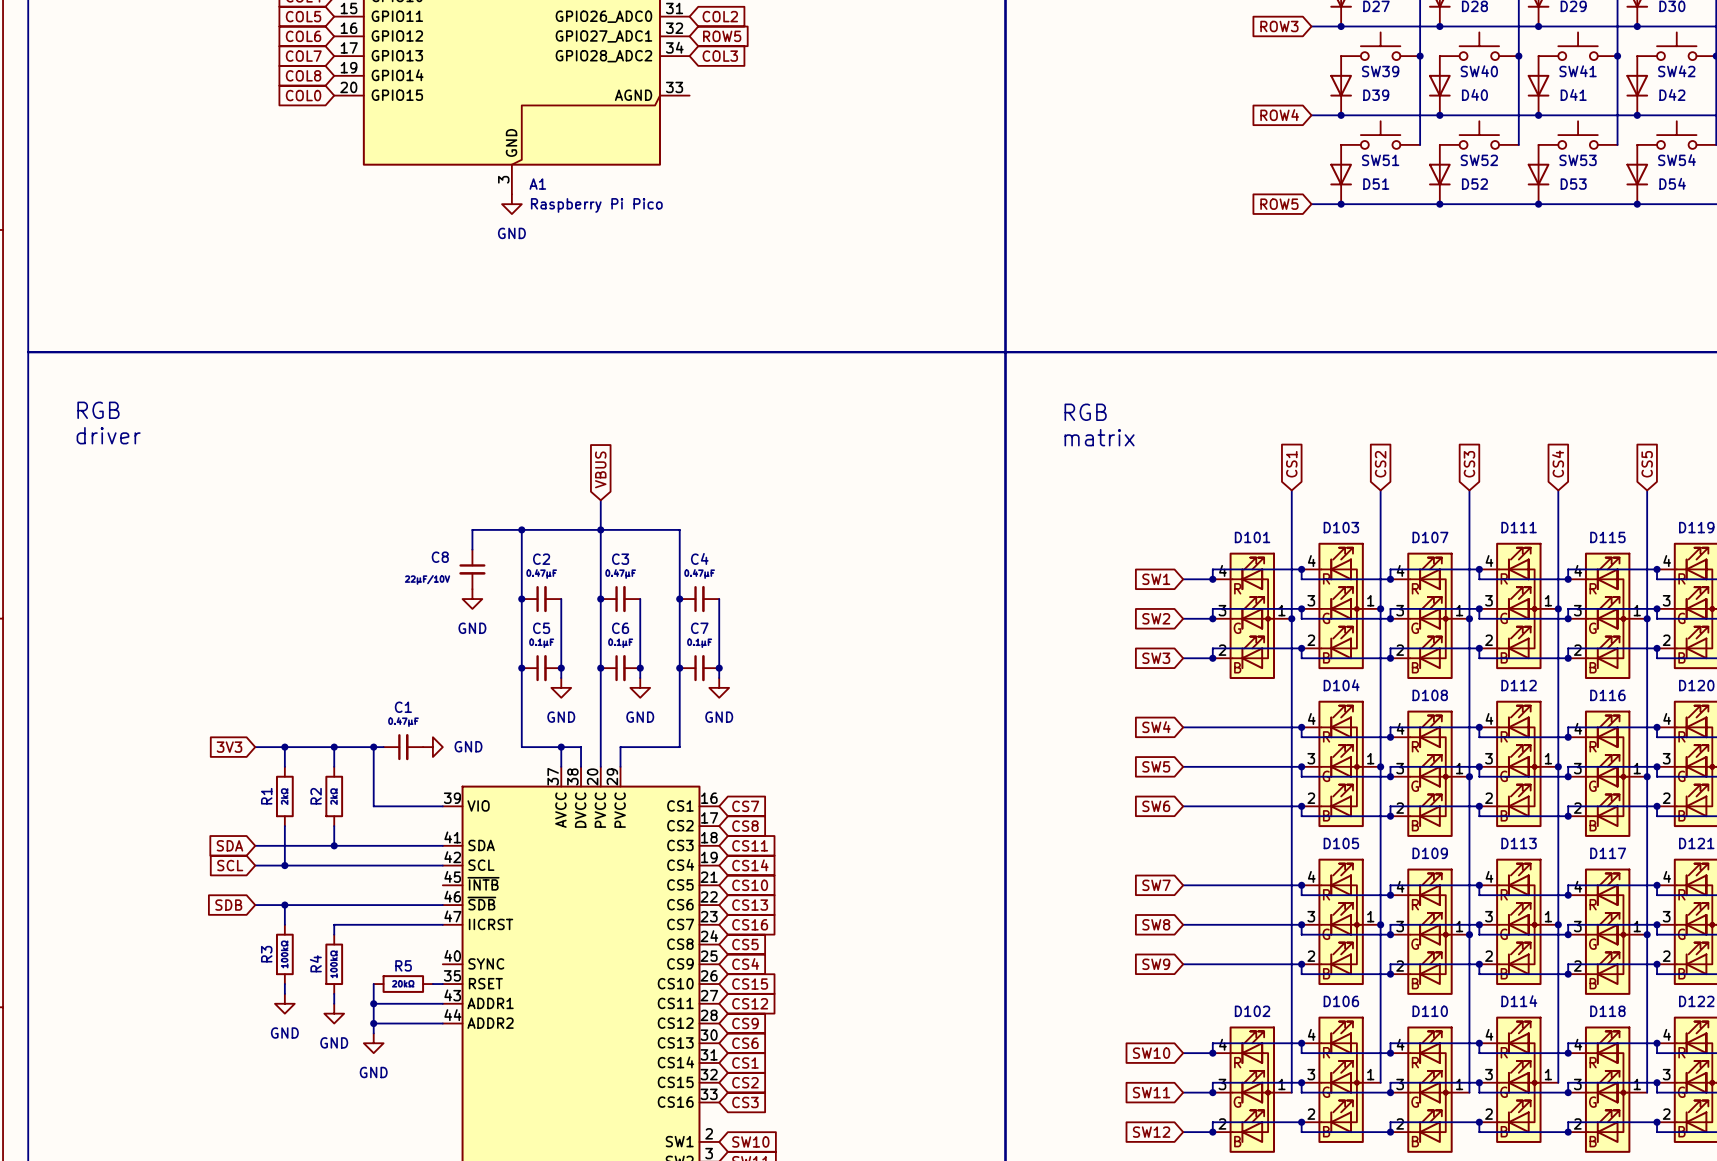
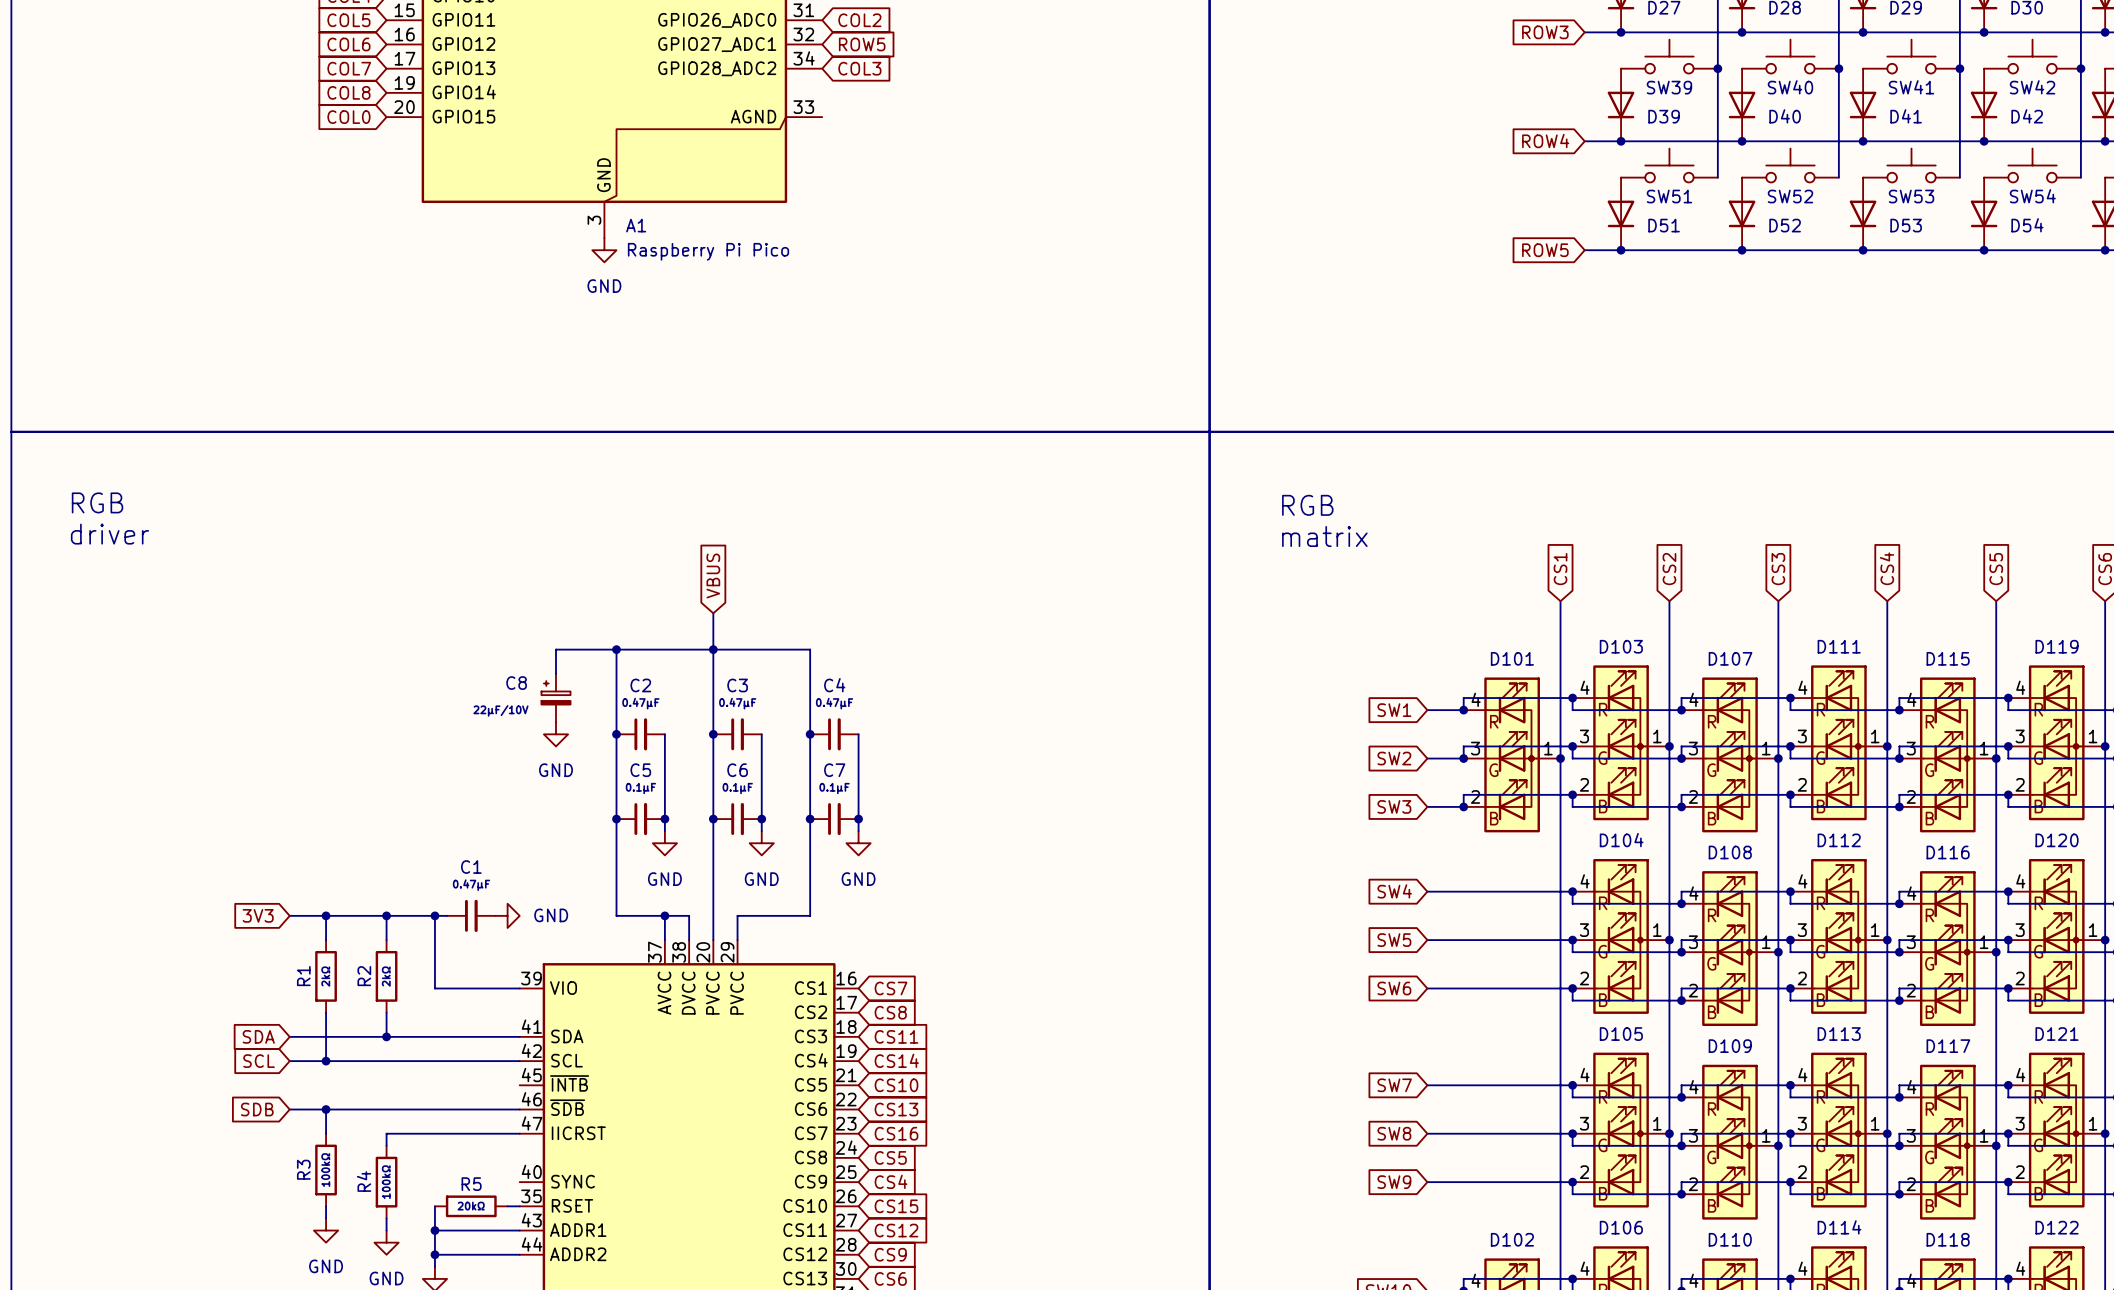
C8 symbol: [459, 549, 486, 590] -> [541, 673, 571, 723]

